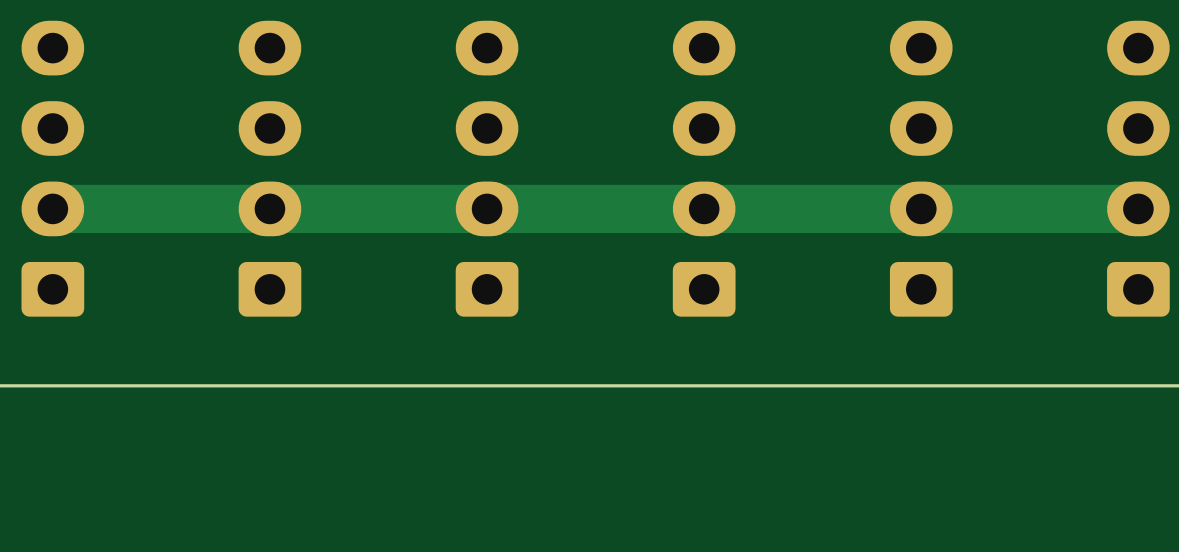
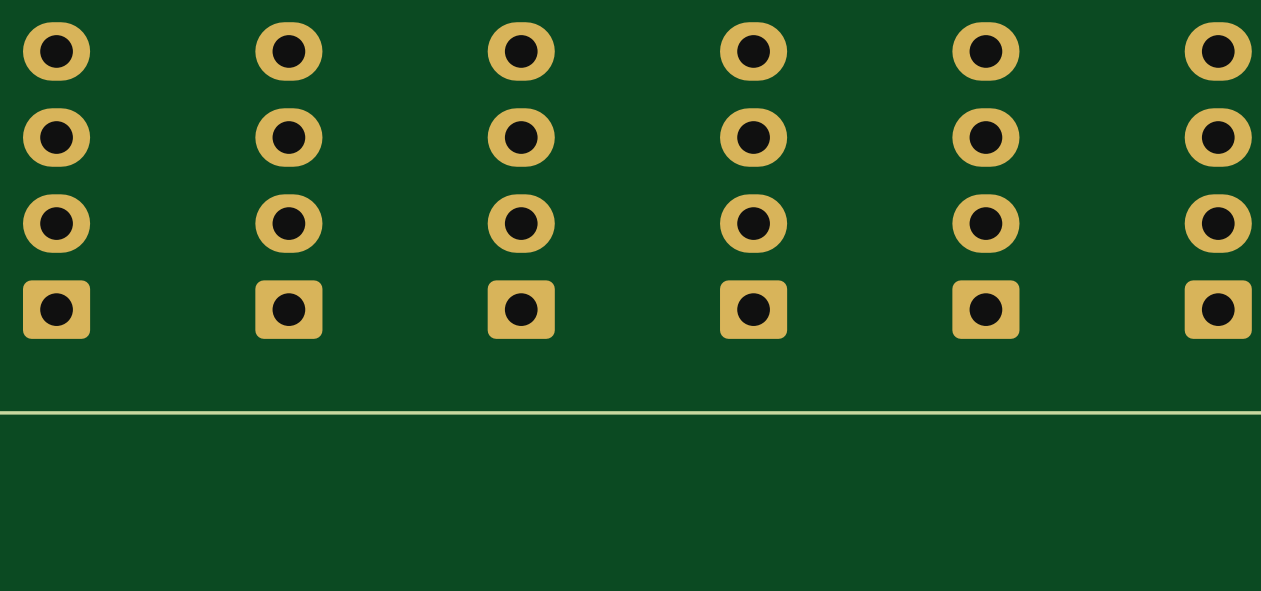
track: (1138, 208) (52, 208) -> none

